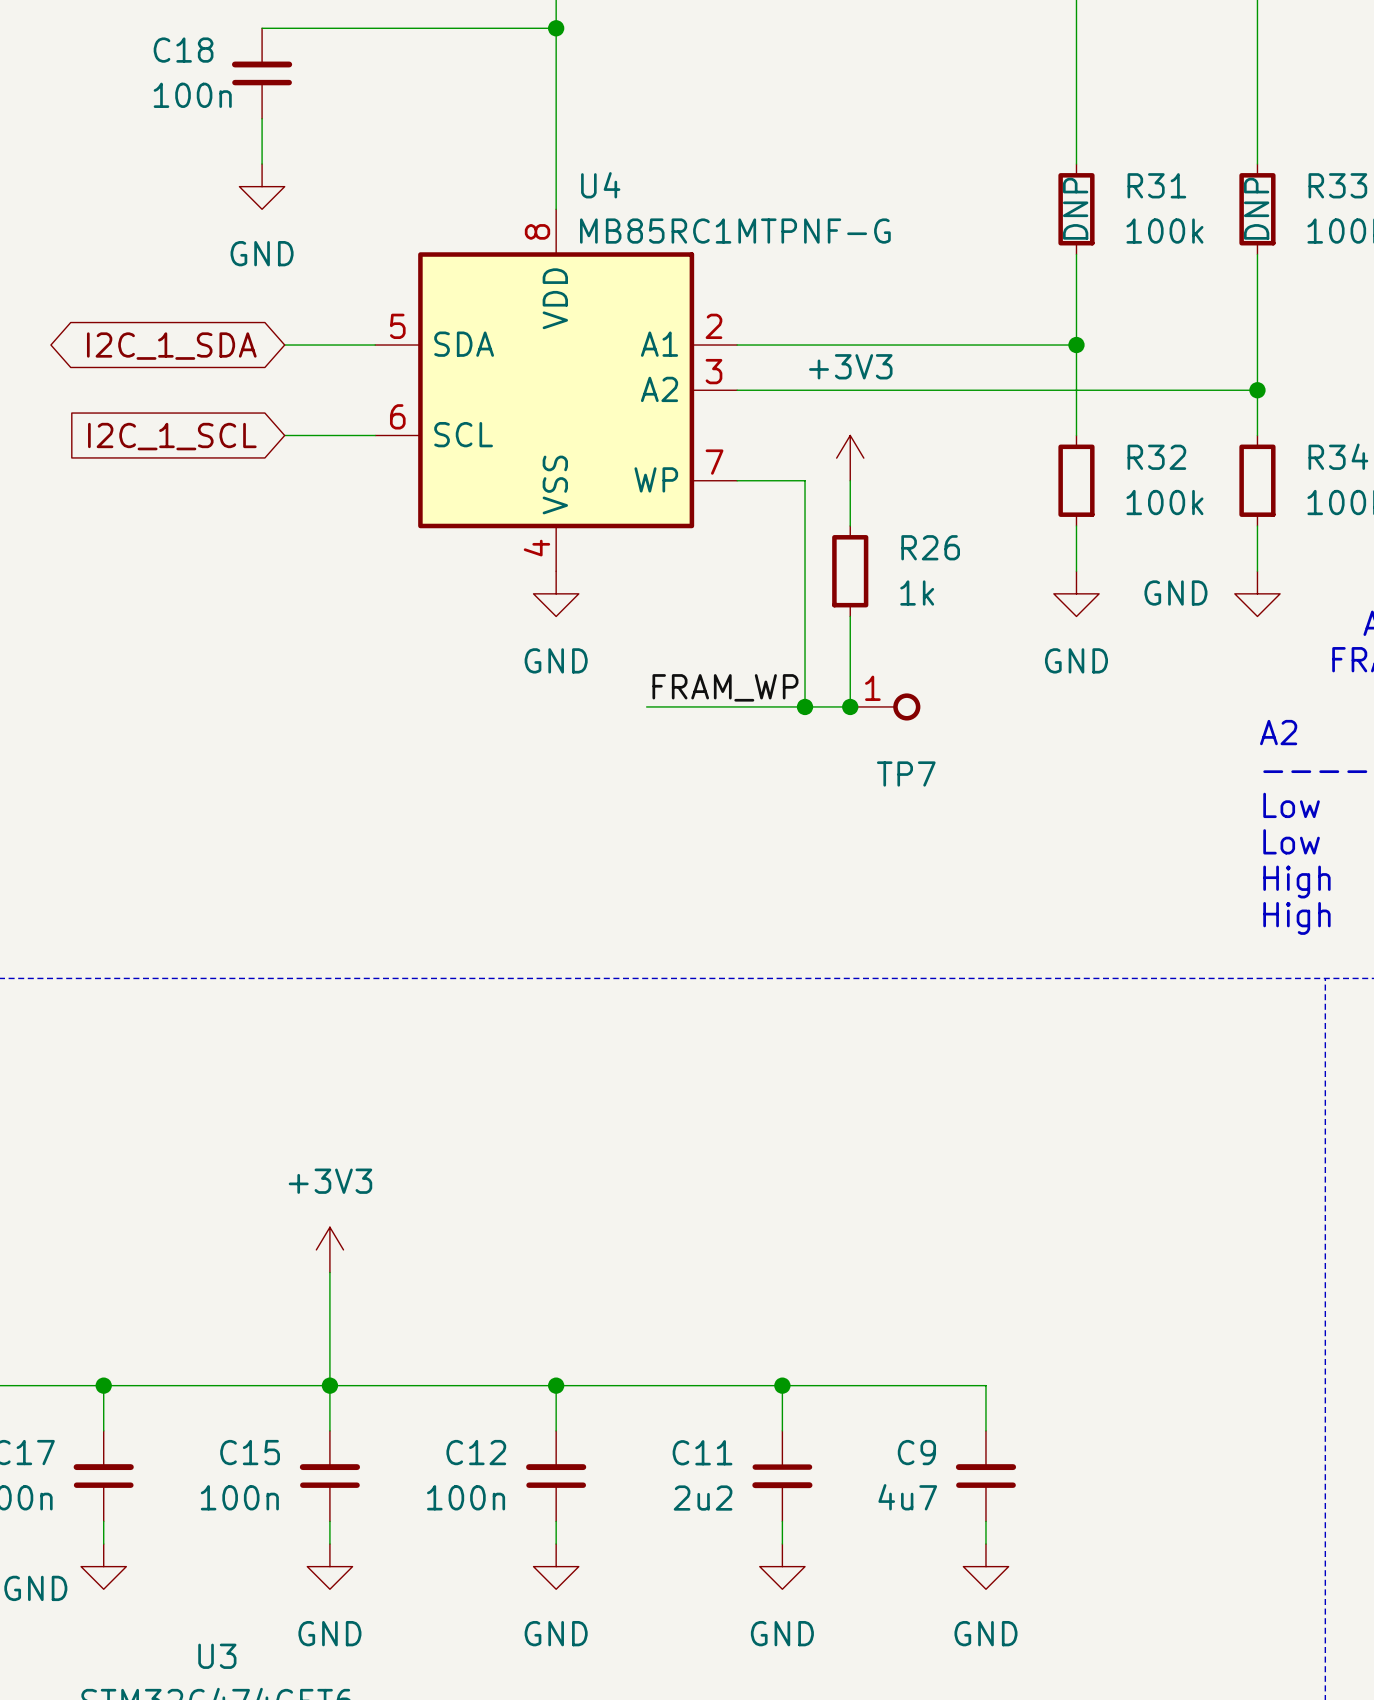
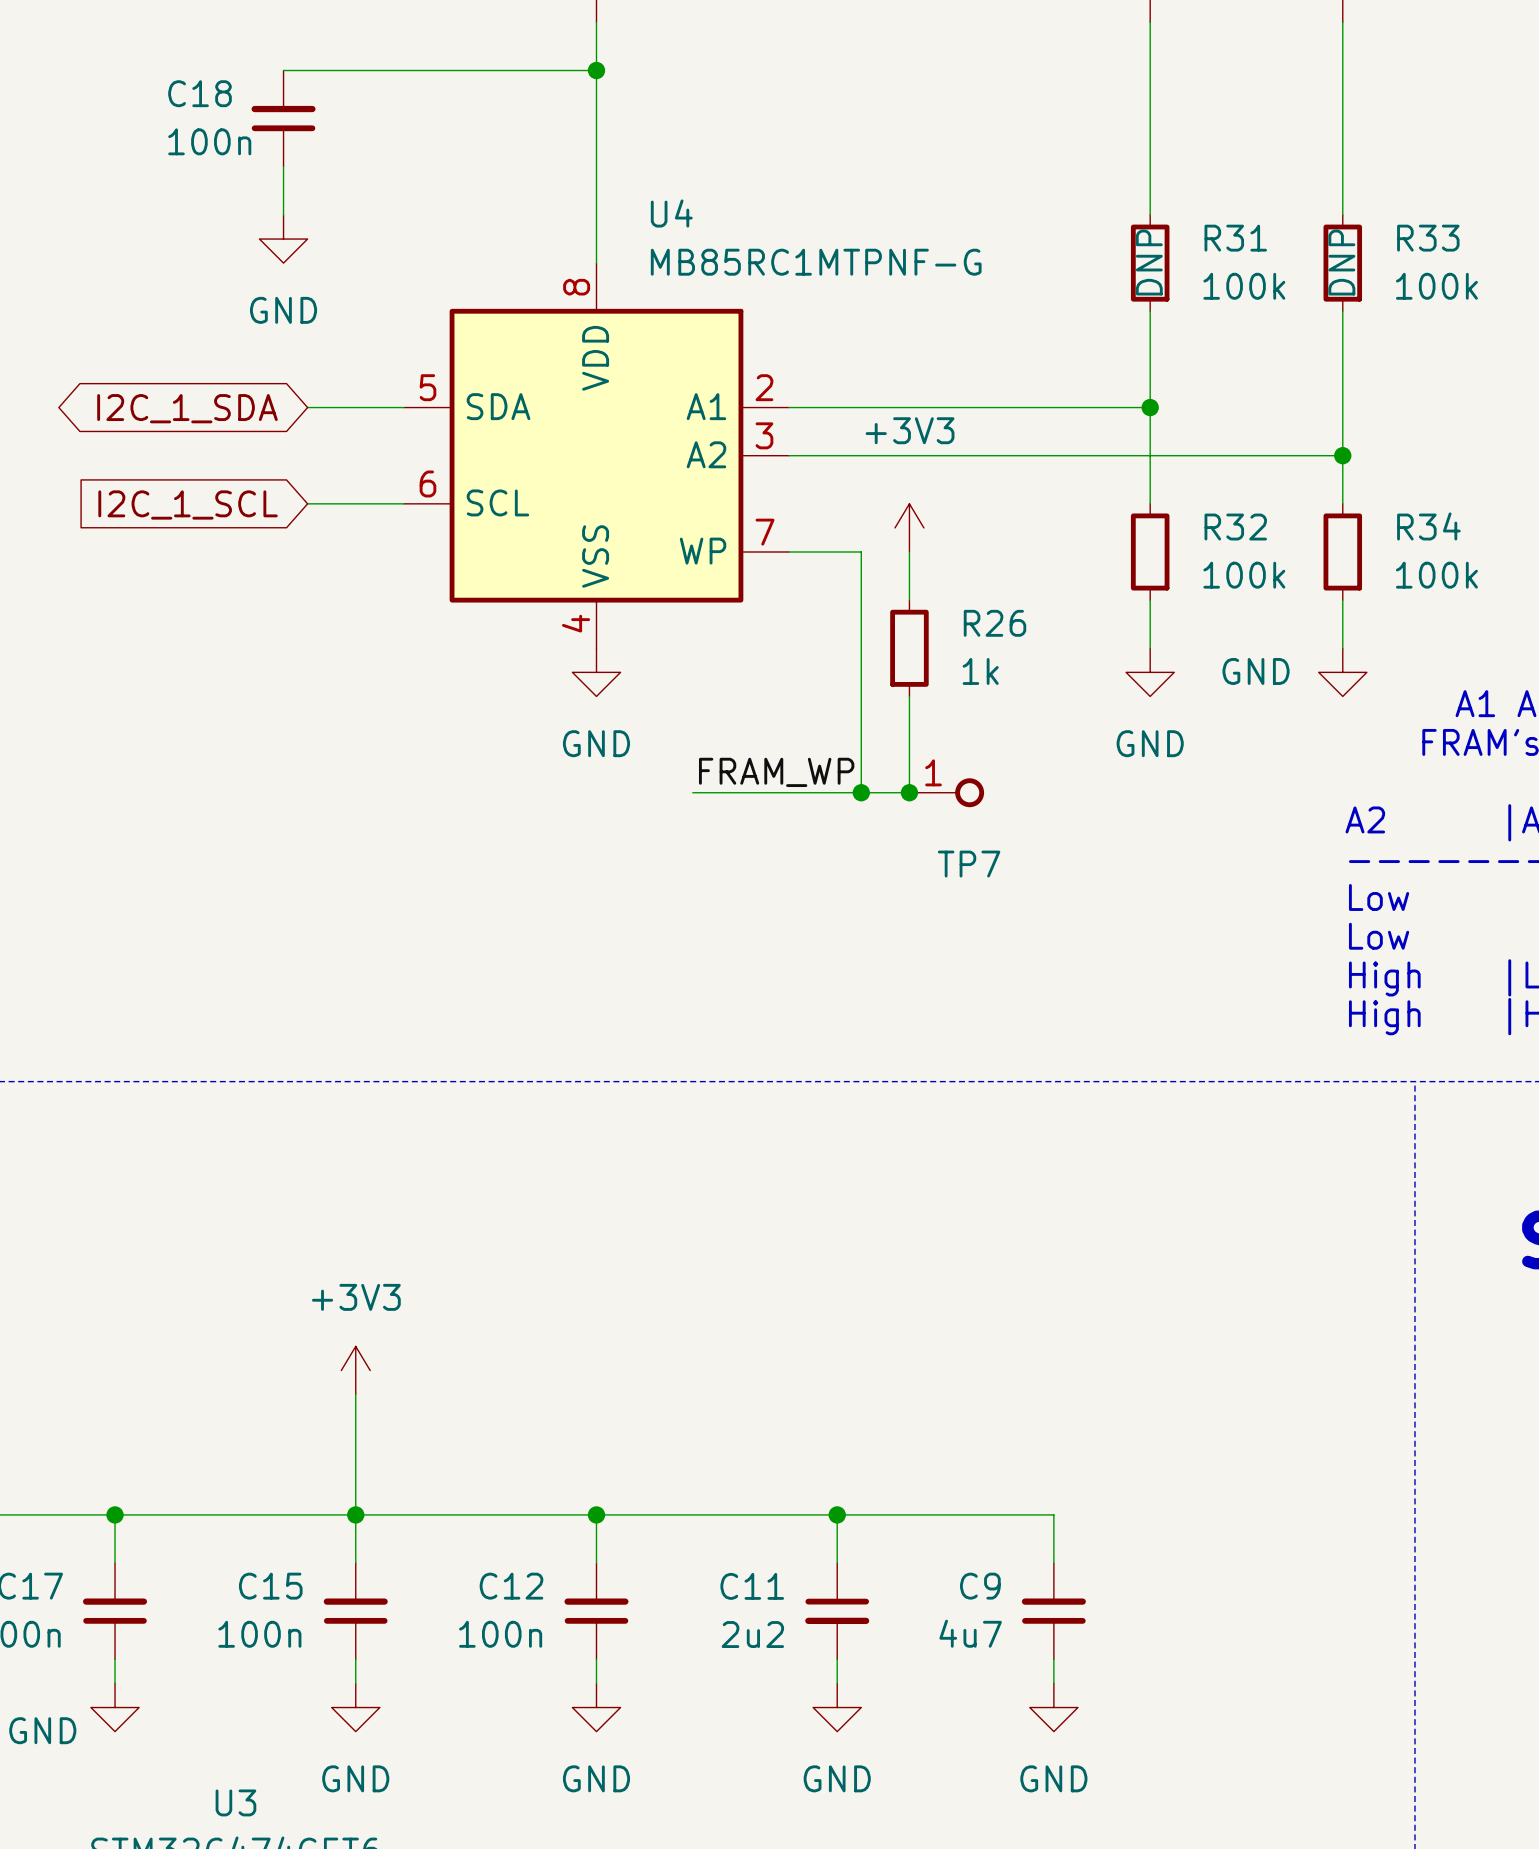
U4 name position: U4 (600, 185) -> U4 (671, 213)
U4 value position: MB85RC1MTPNF-G (735, 231) -> MB85RC1MTPNF-G (816, 262)

